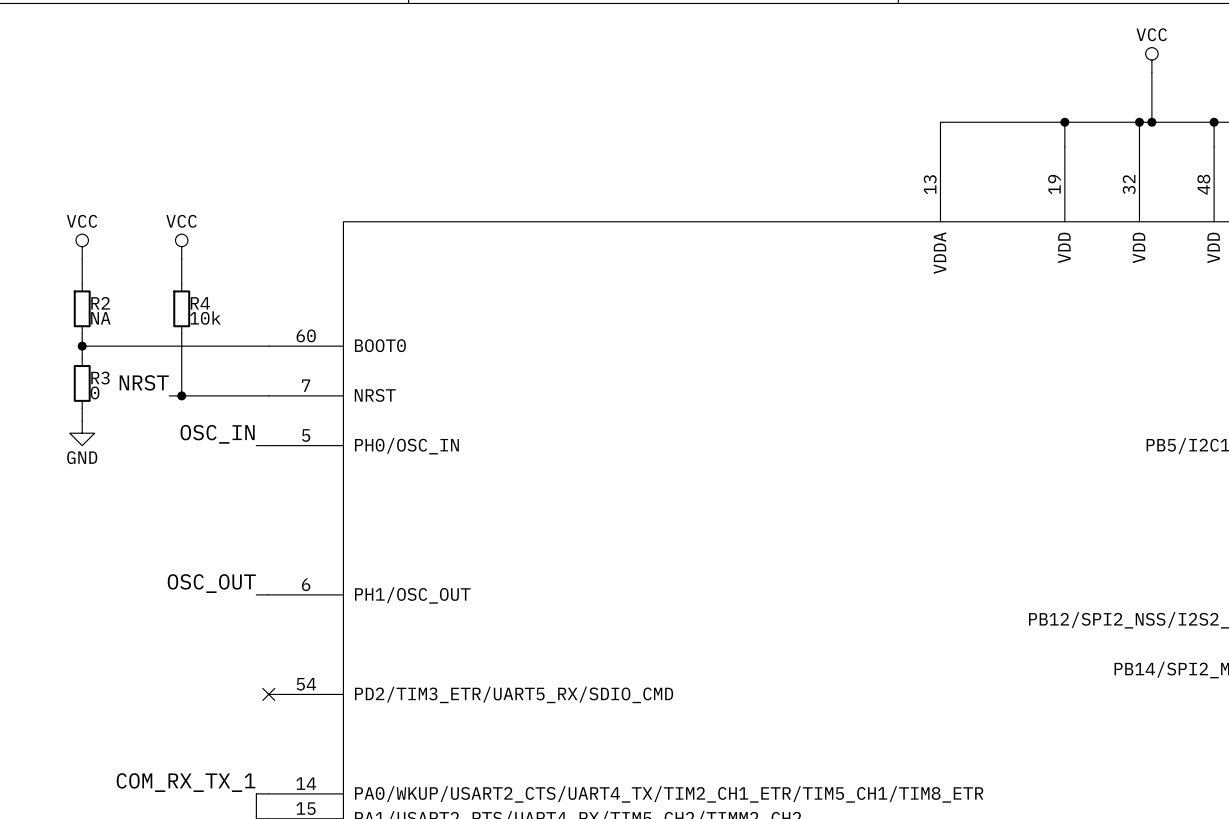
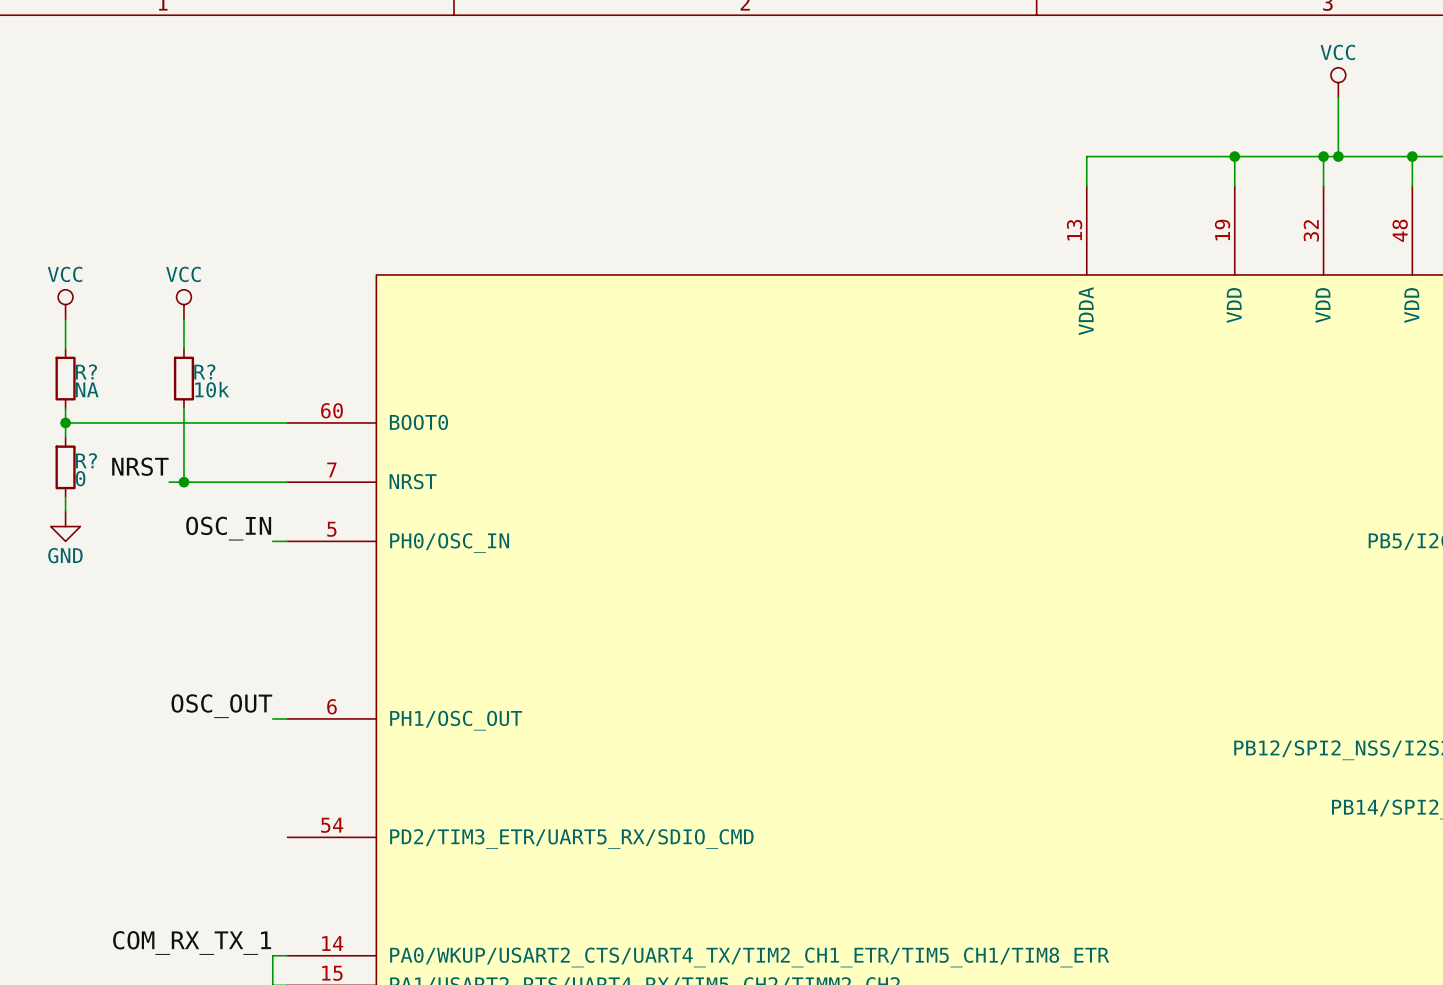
R2 name: R2 (100, 303) -> R? (86, 371)
R4 name: R4 (200, 303) -> R? (204, 371)
R3 name: R3 (100, 378) -> R? (86, 460)
no-connect mark: (268, 694) -> none

